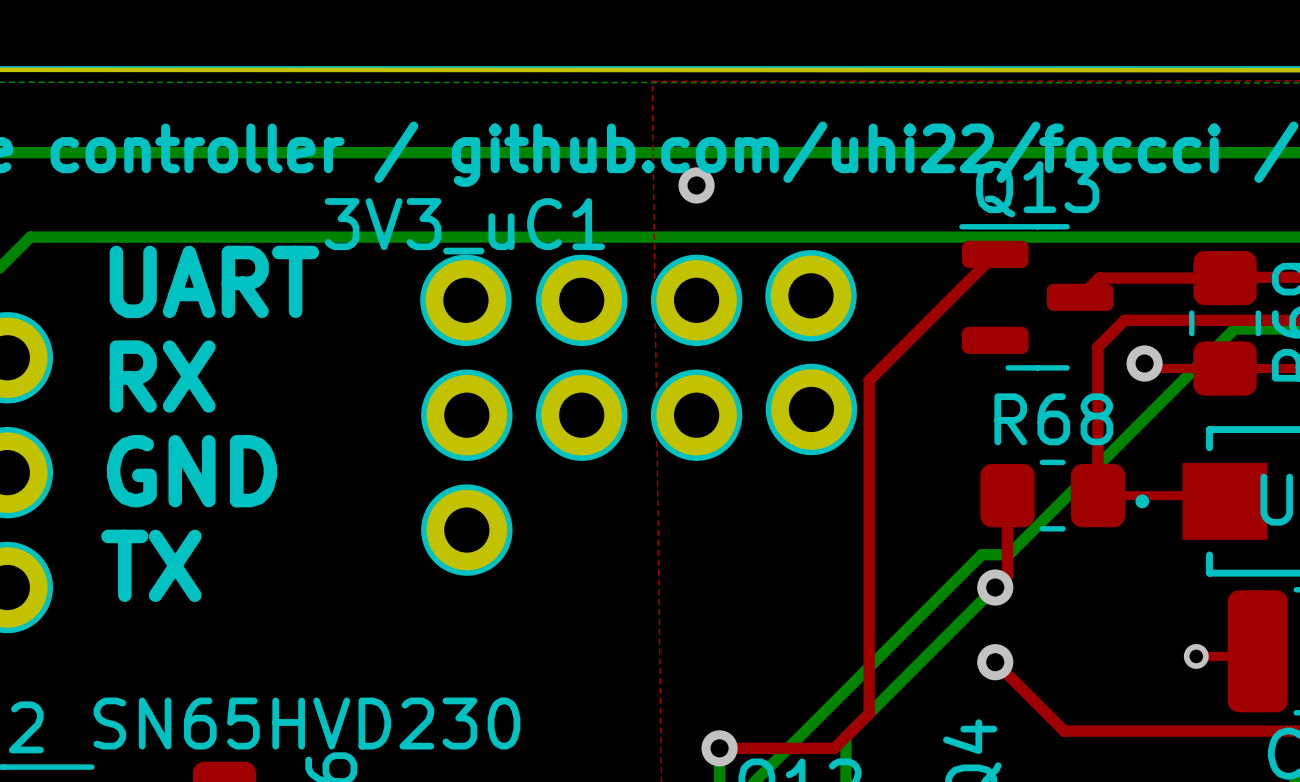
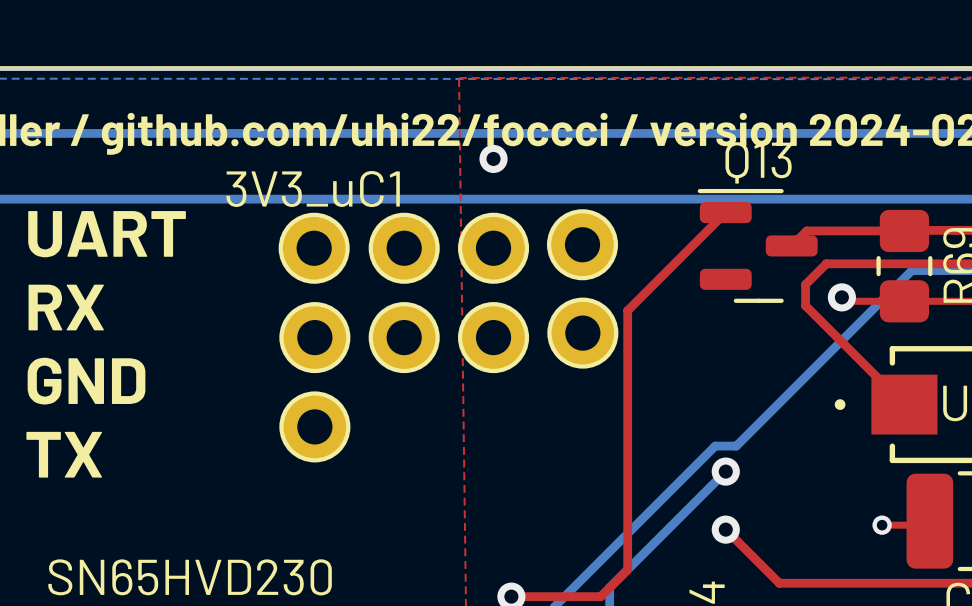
top track: (1097, 374) (1097, 495) (1219, 495) -> (805, 305) (904, 404)
top track: (1007, 495) (1007, 575) (995, 587) -> none
R68: (1052, 495) -> none

